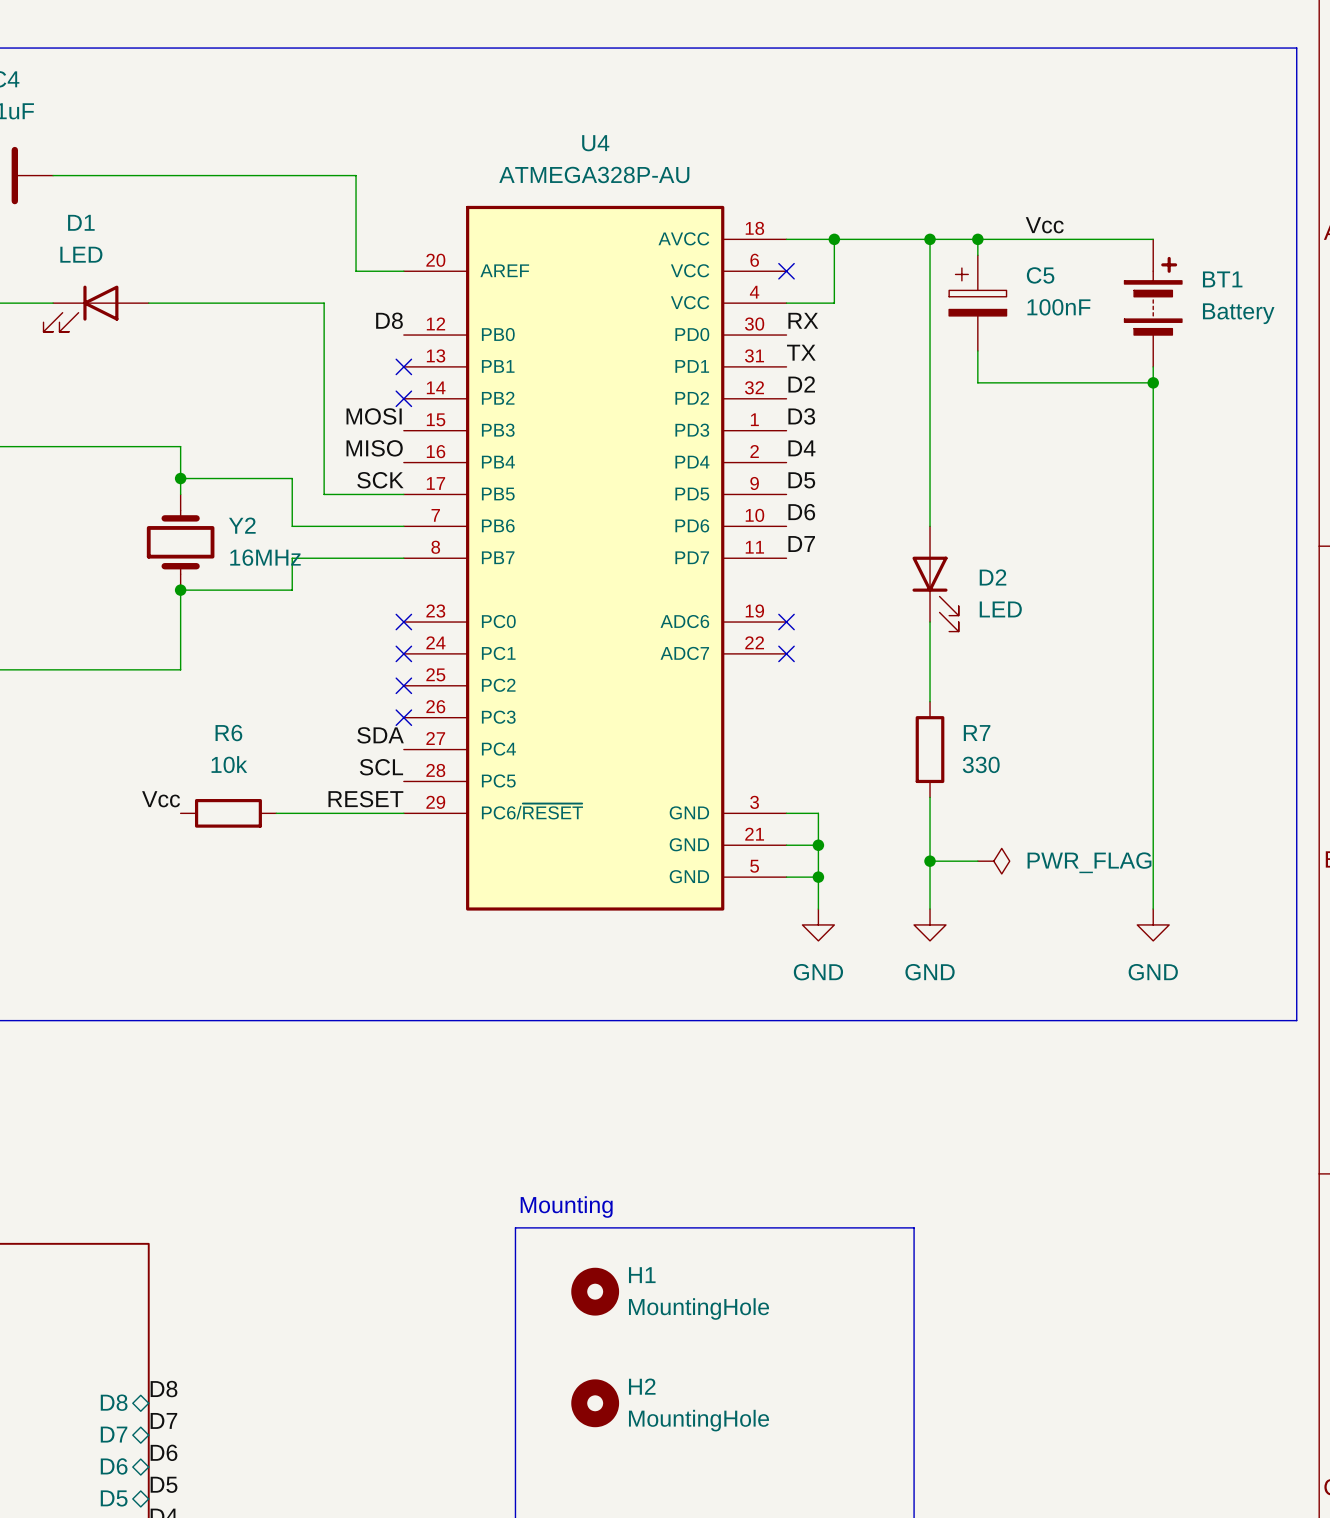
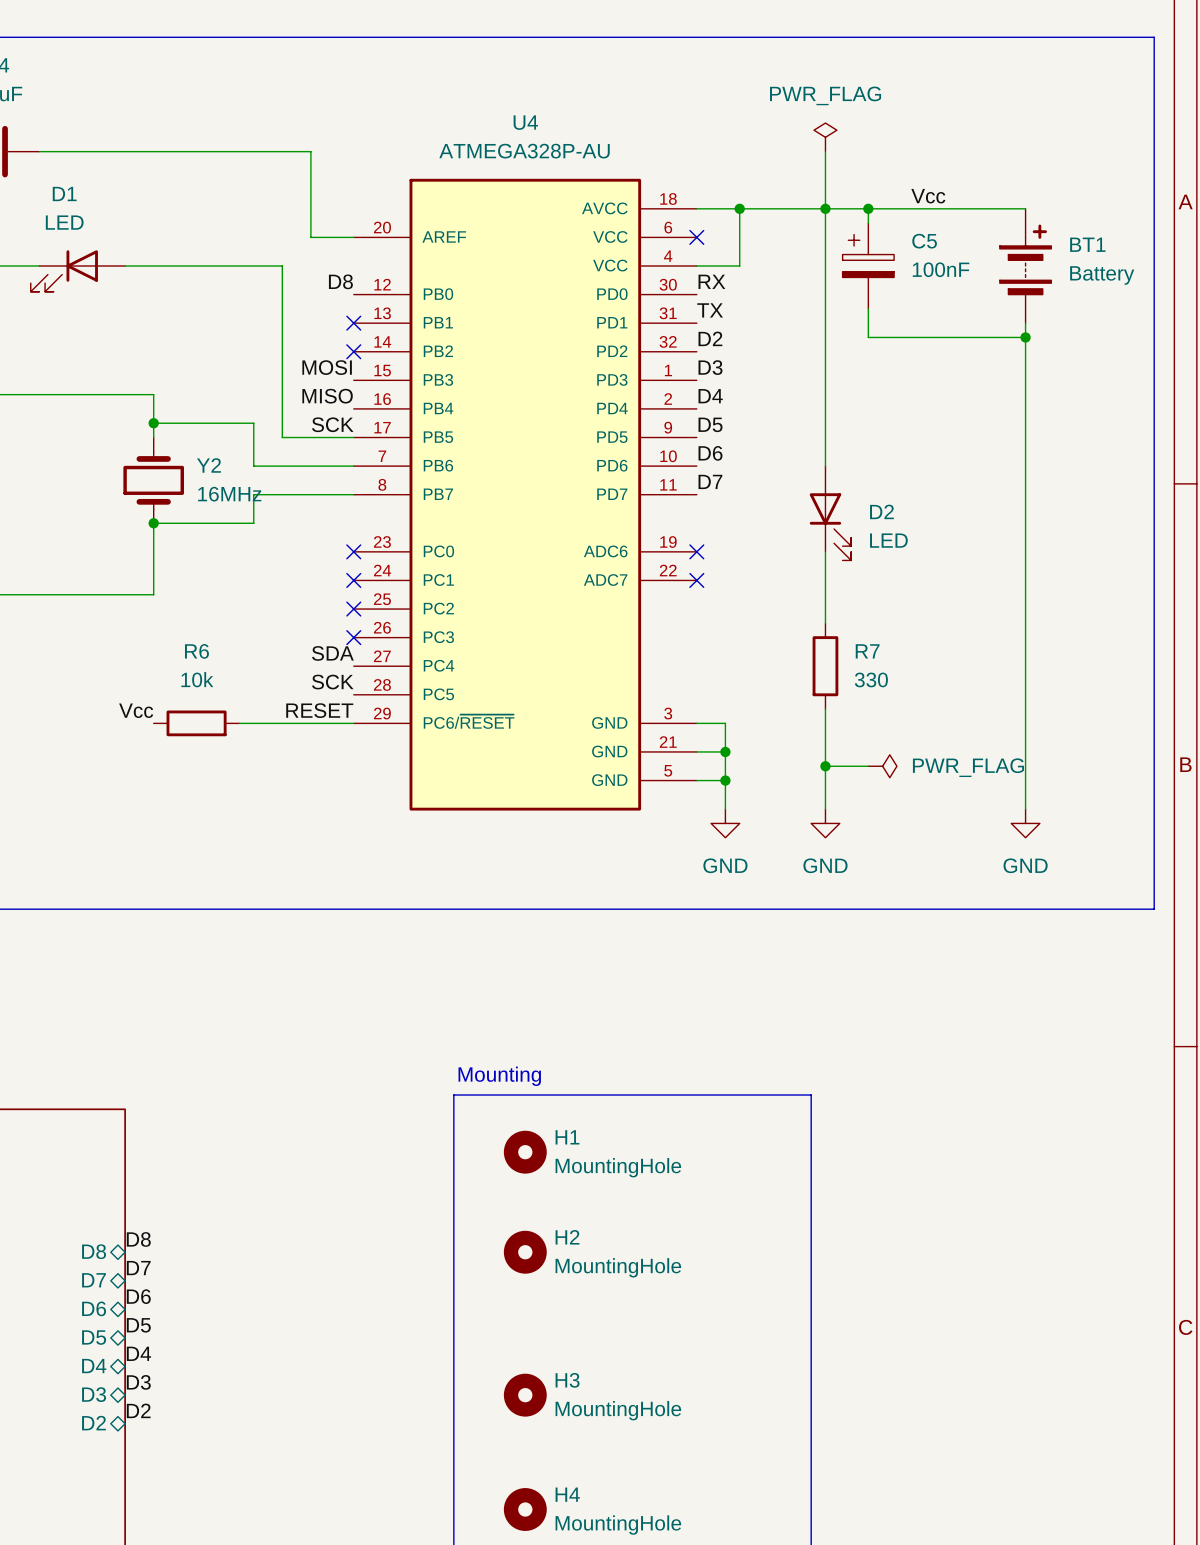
power symbol: none -> PWR_FLAG (825, 137)
wire: none -> (825, 151) (825, 208)
label: SCL (381, 767) -> SCK (332, 682)

